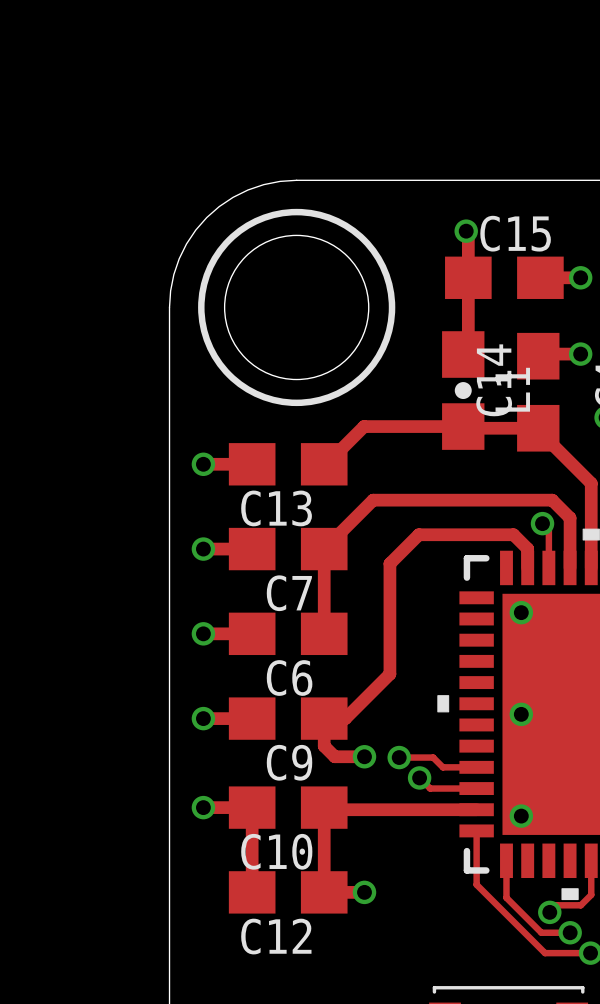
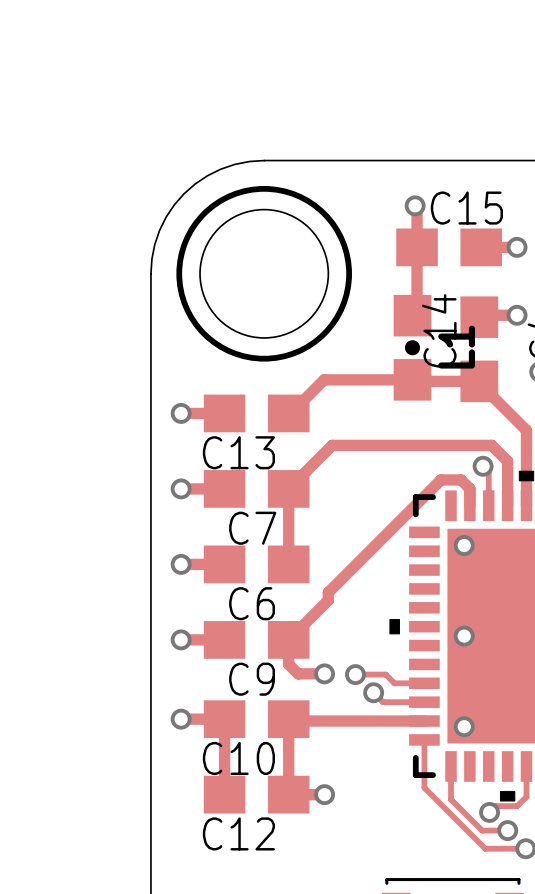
track: (517, 538) (513, 534) (418, 534) (389, 563) (389, 674) (345, 718) (324, 718) -> (461, 479) (440, 479) (328, 592) (328, 600) (288, 639)

